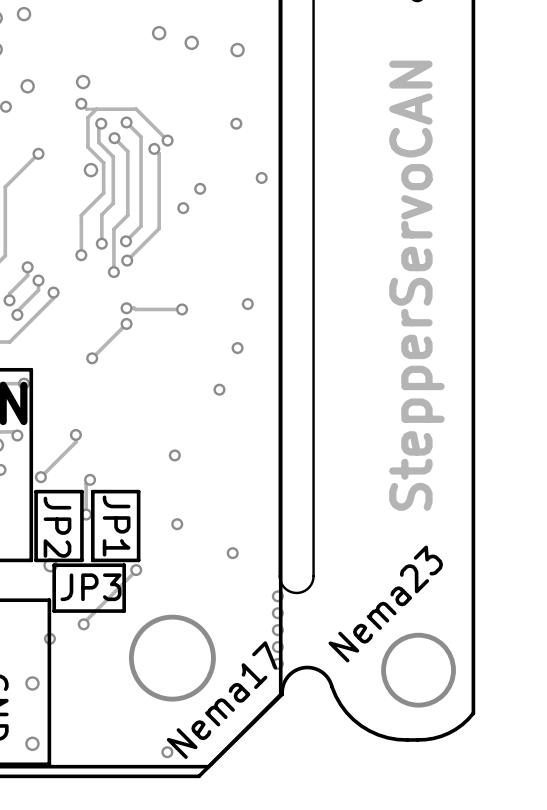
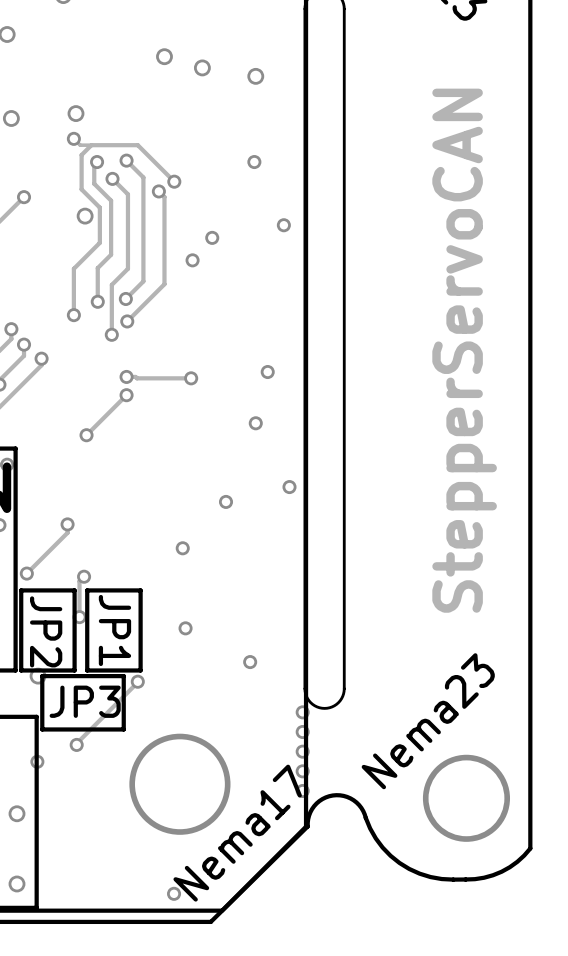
via: (219, 389) -> none
via: none -> (289, 487)
via: none -> (226, 501)

